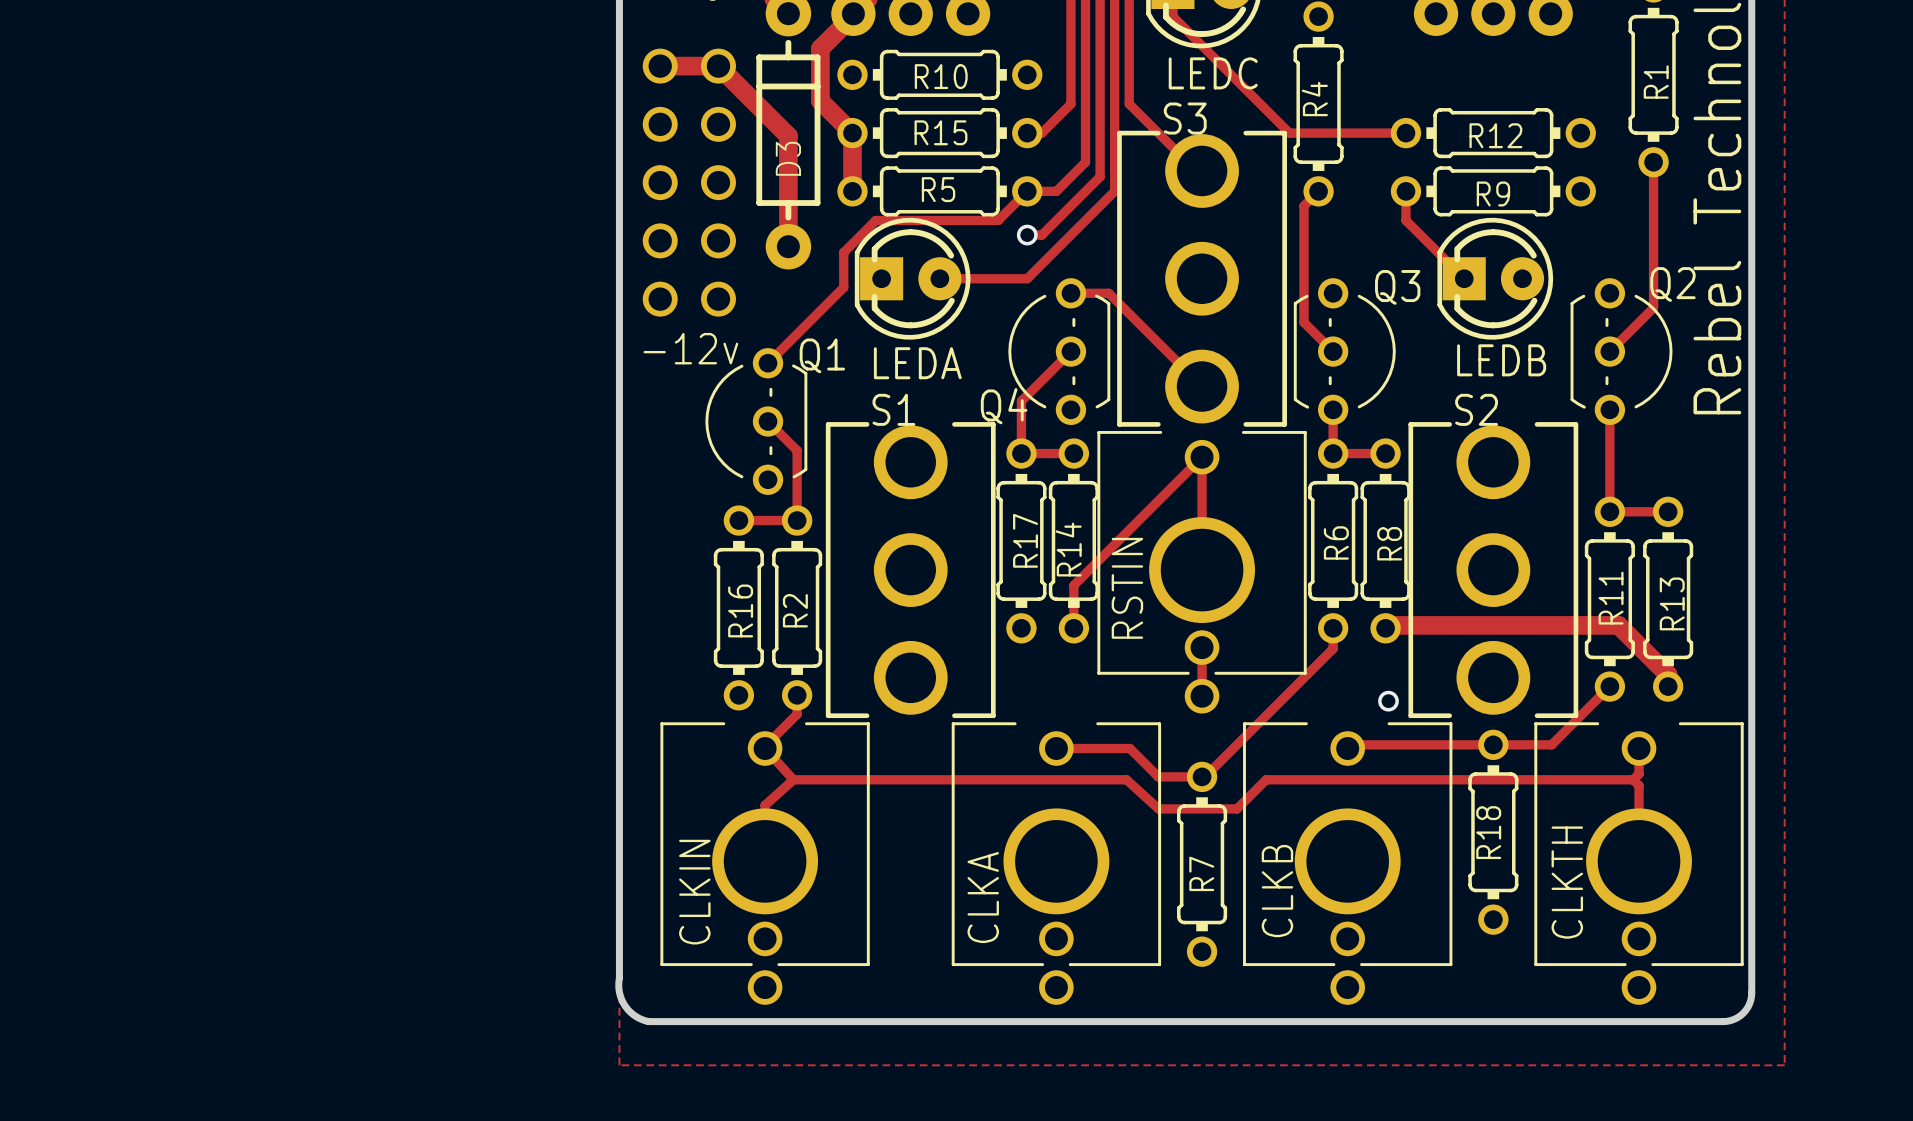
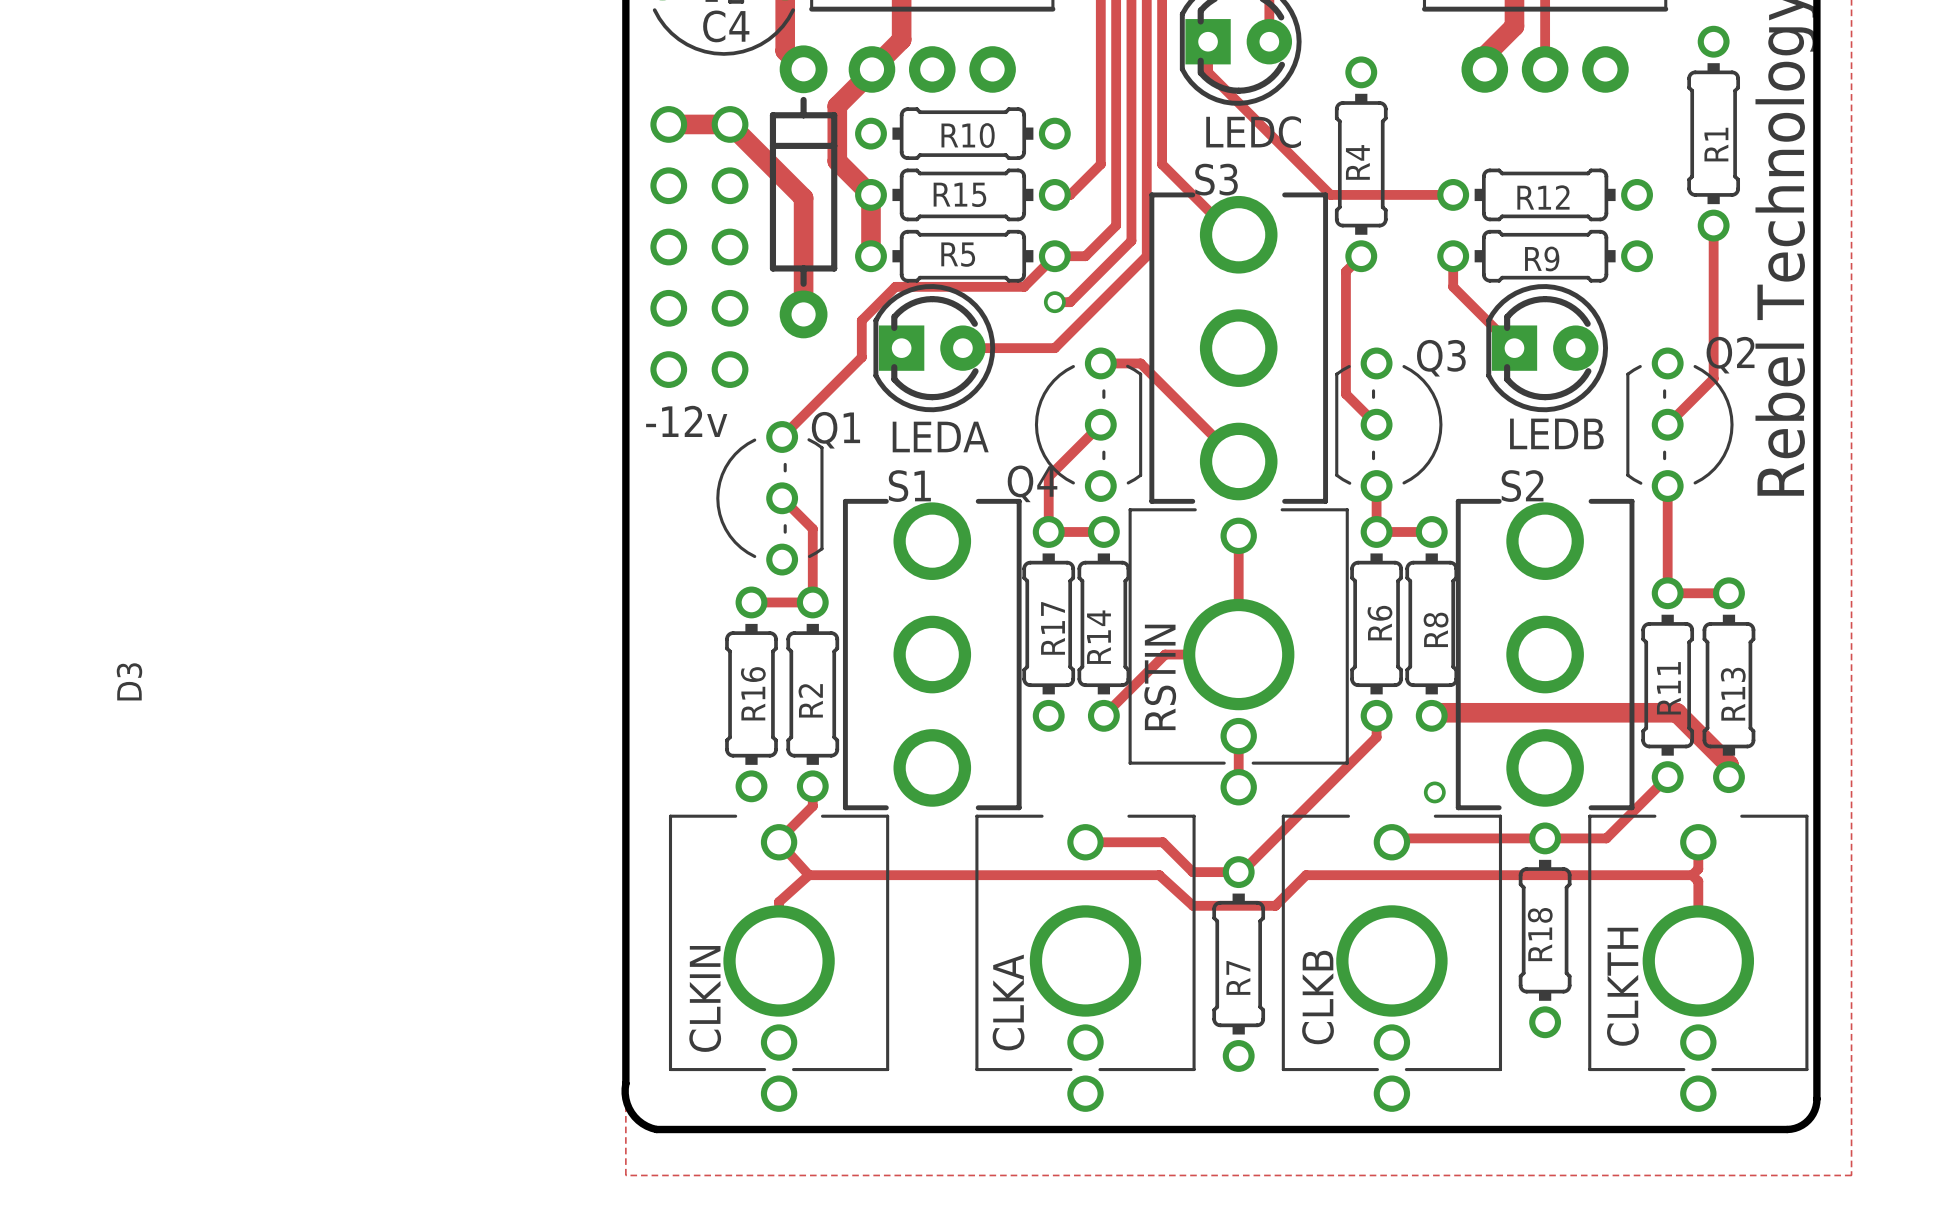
D3 name position: D3 (788, 158) -> D3 (129, 681)
track: (1202, 457) (1073, 585) (1073, 628) -> (1238, 654) (1165, 654) (1103, 715)

